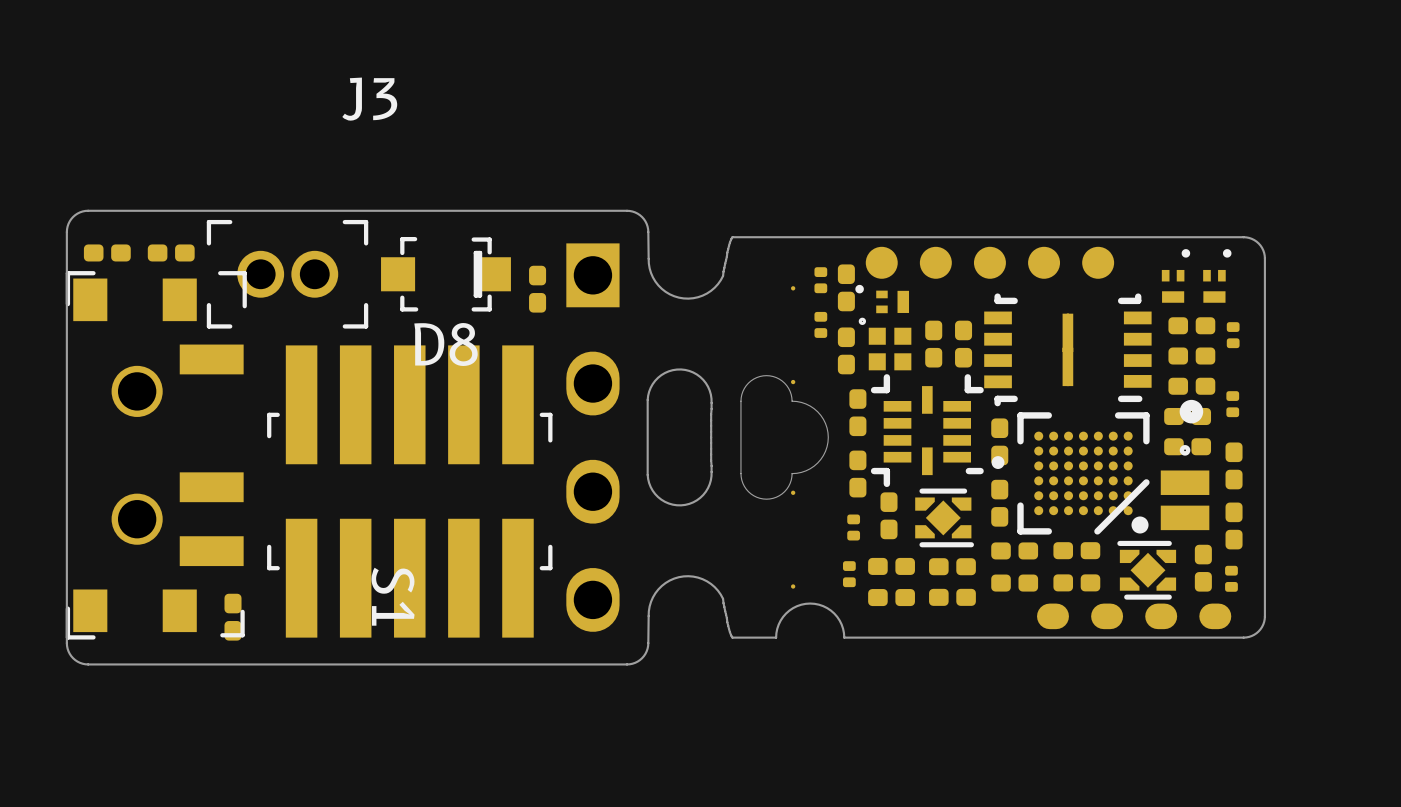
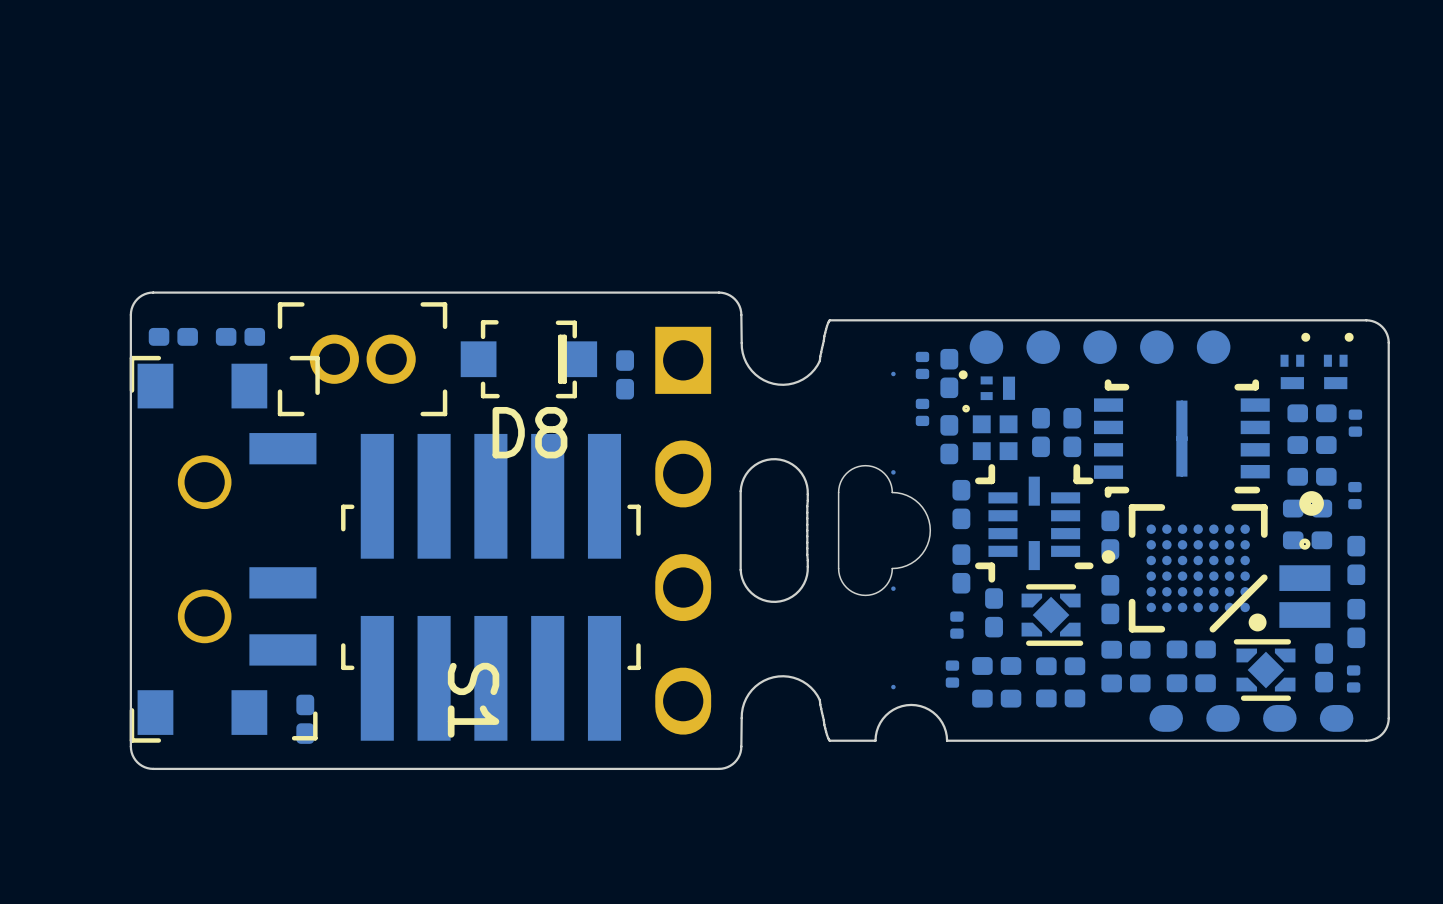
J3 name: J3 (369, 99) -> none

